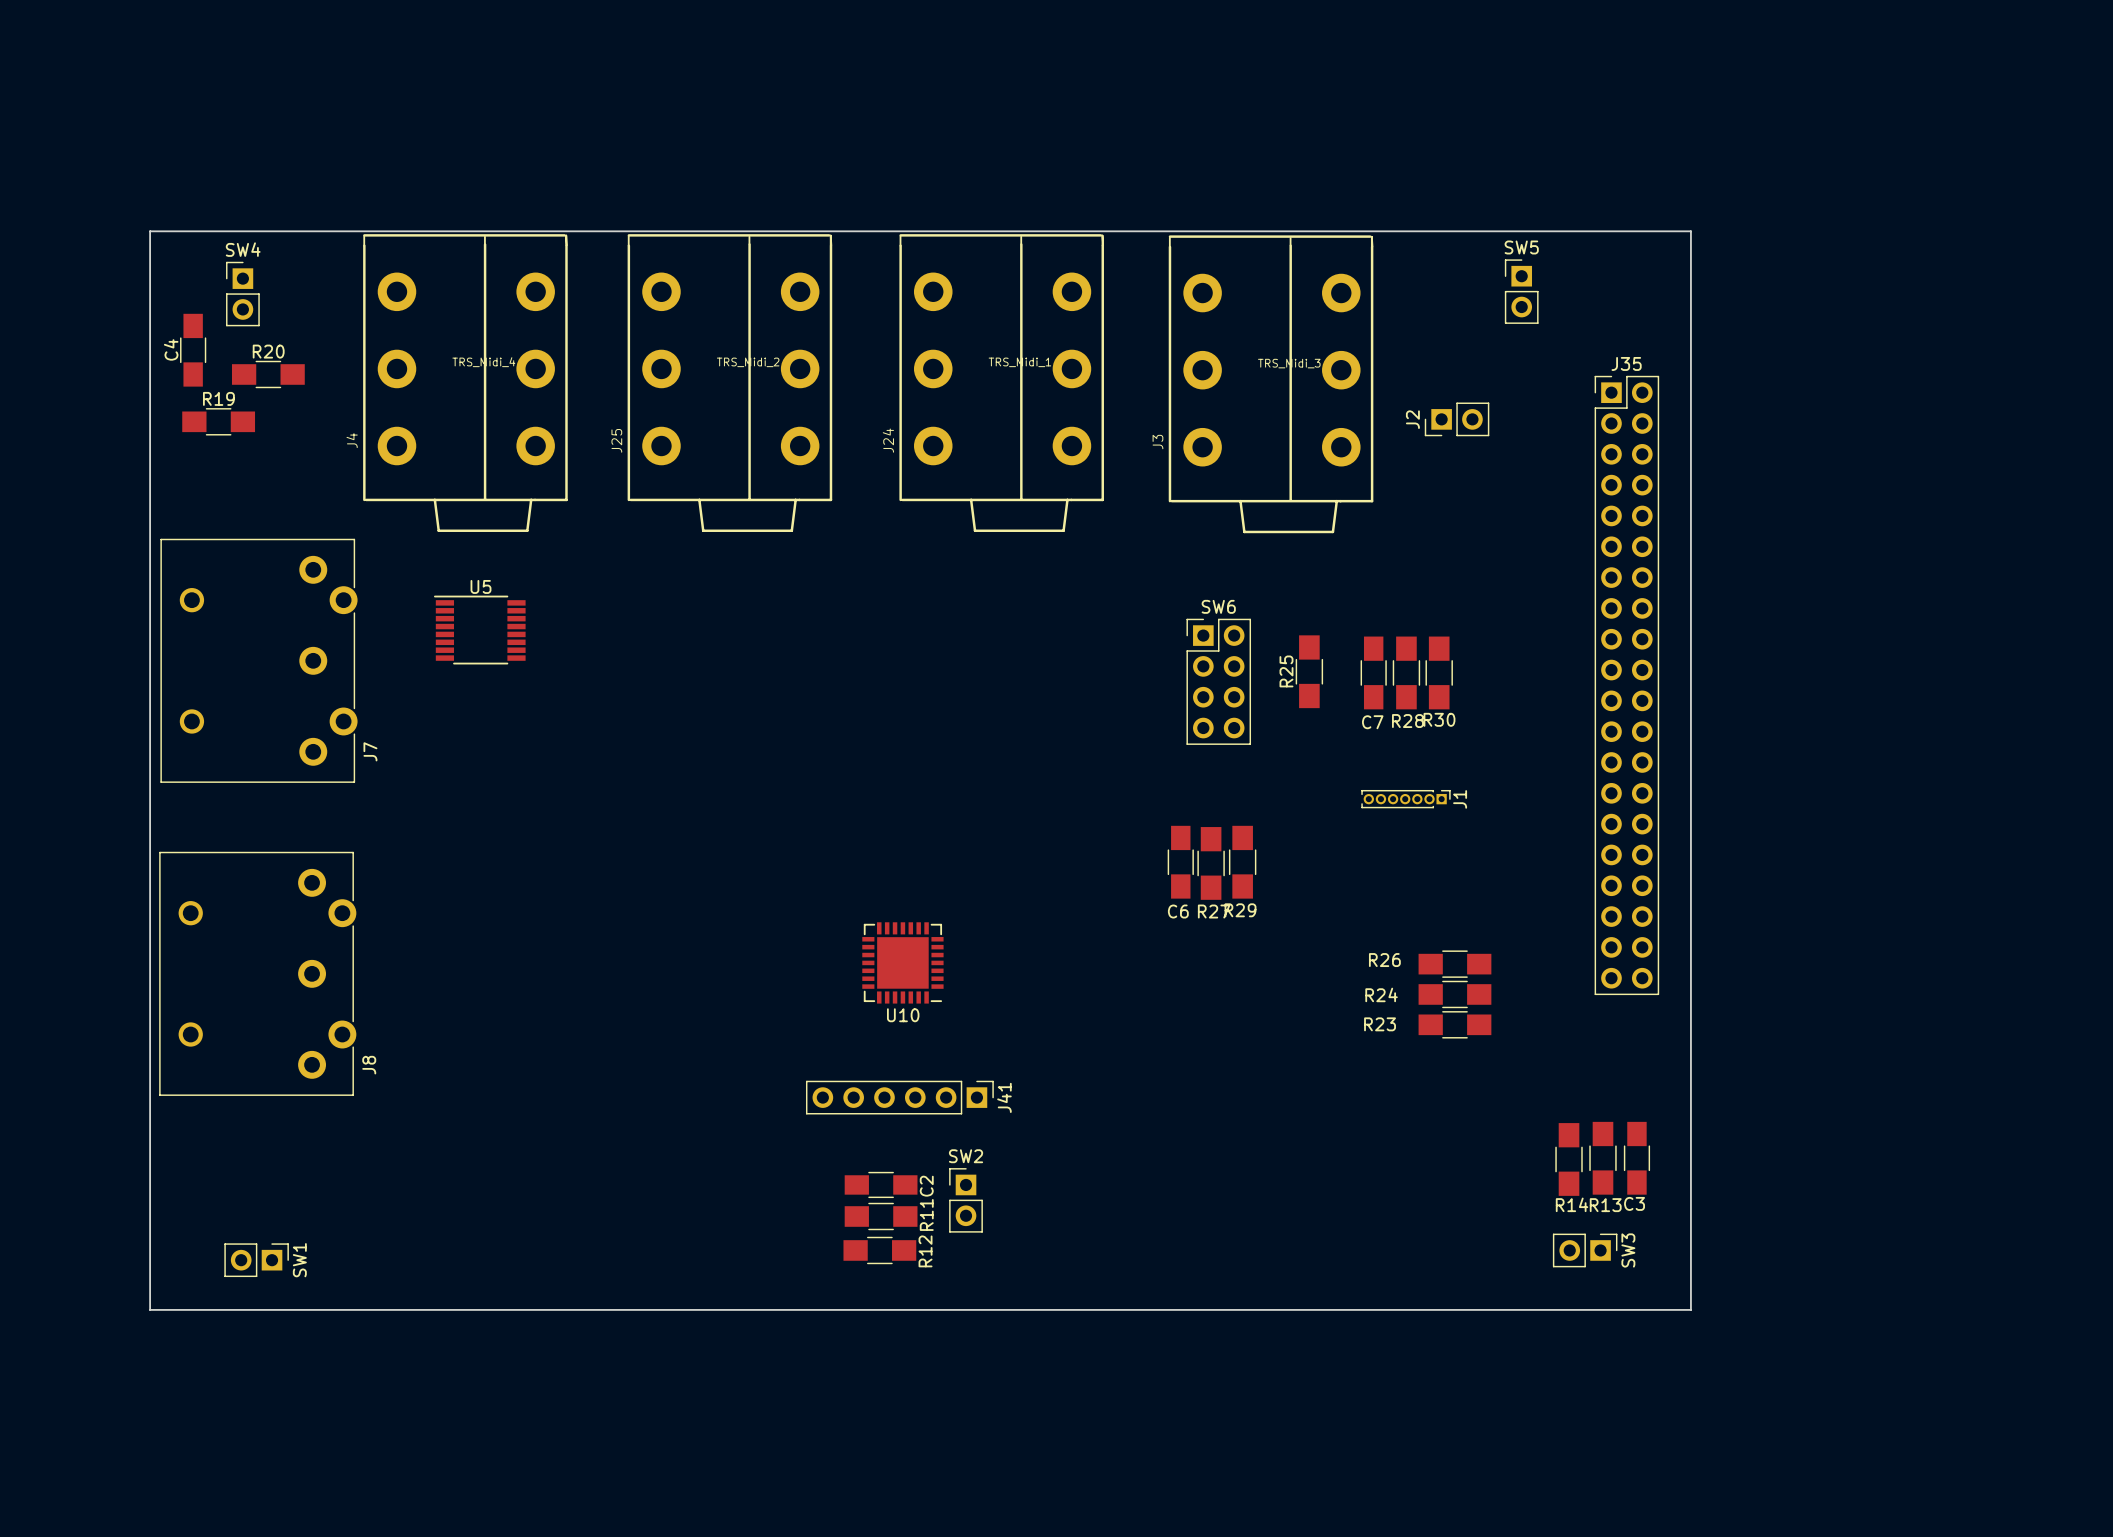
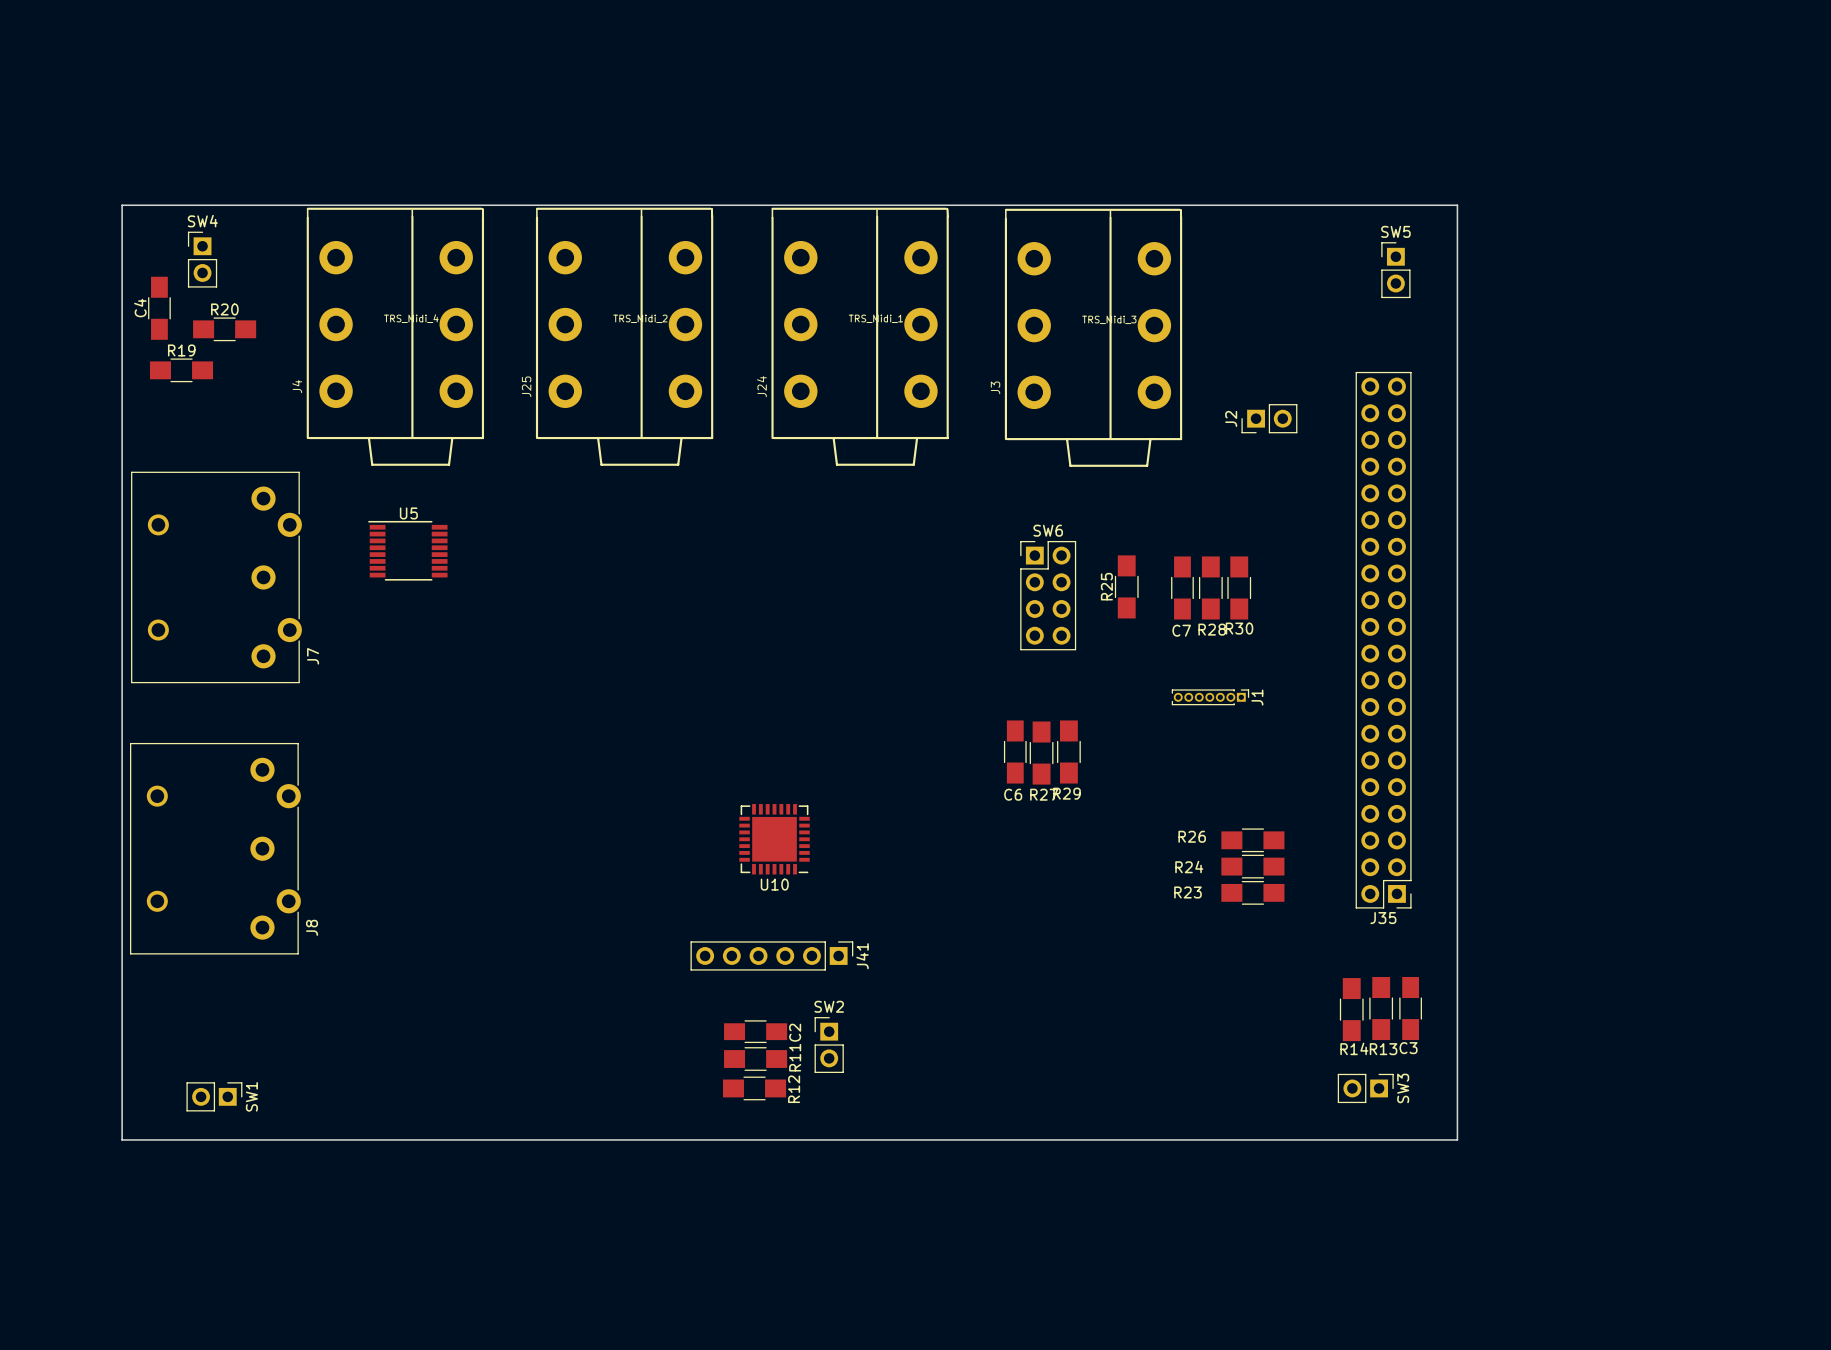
SW5 position: (1521, 291) -> (1395, 270)
J2 position: (1457, 419) -> (1269, 418)
J35 rotation: 0° (1626, 685) -> 180° (1383, 640)

